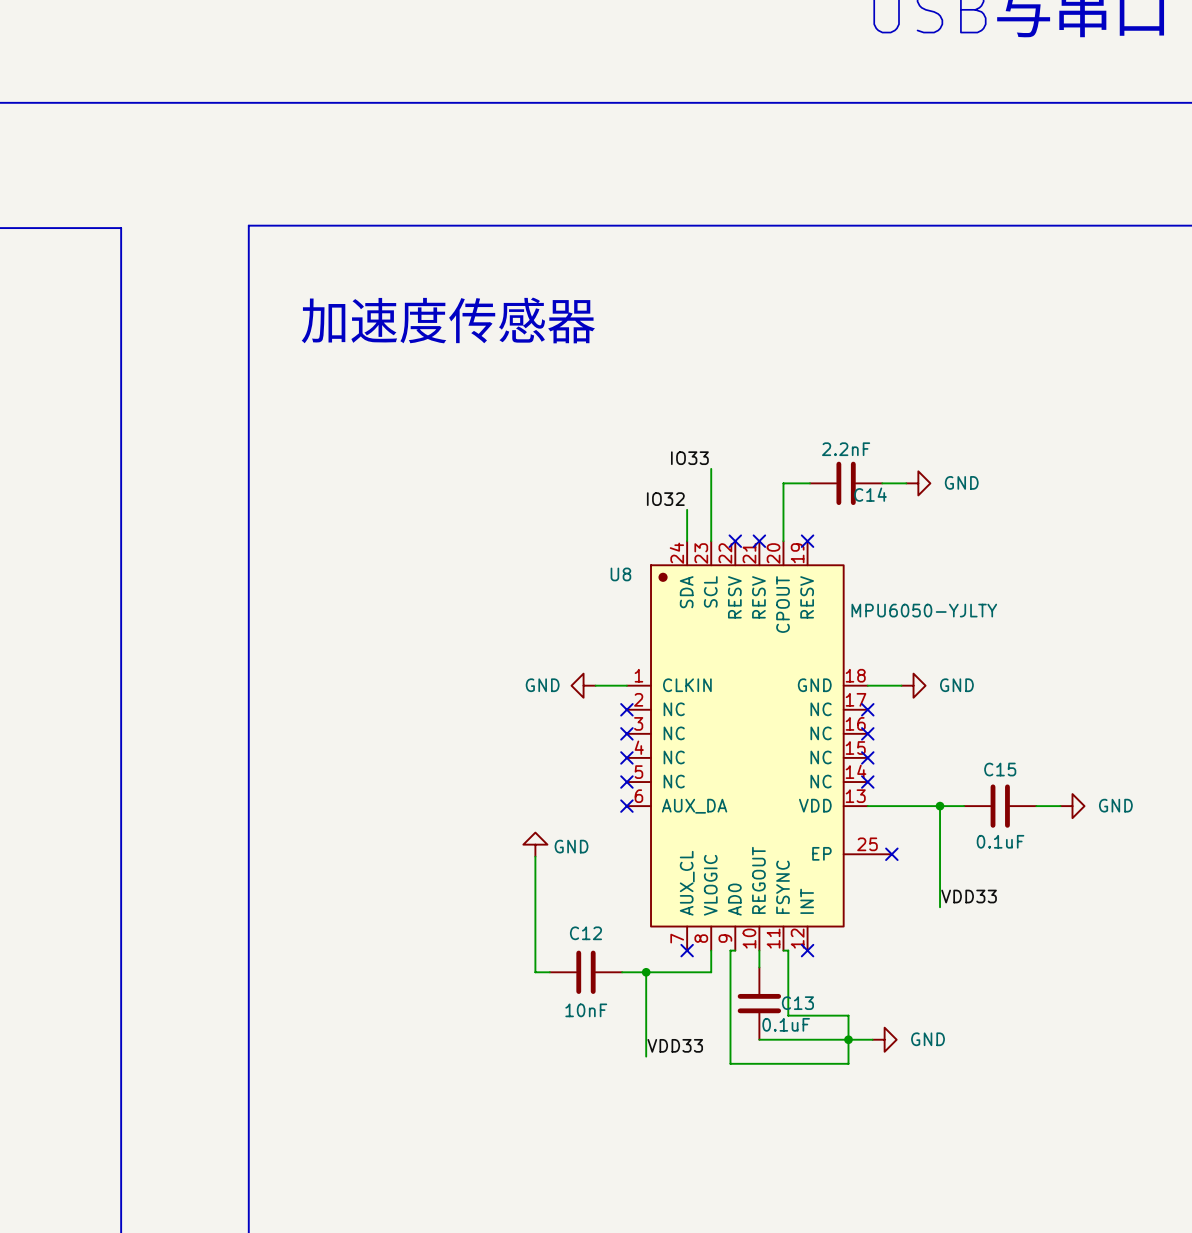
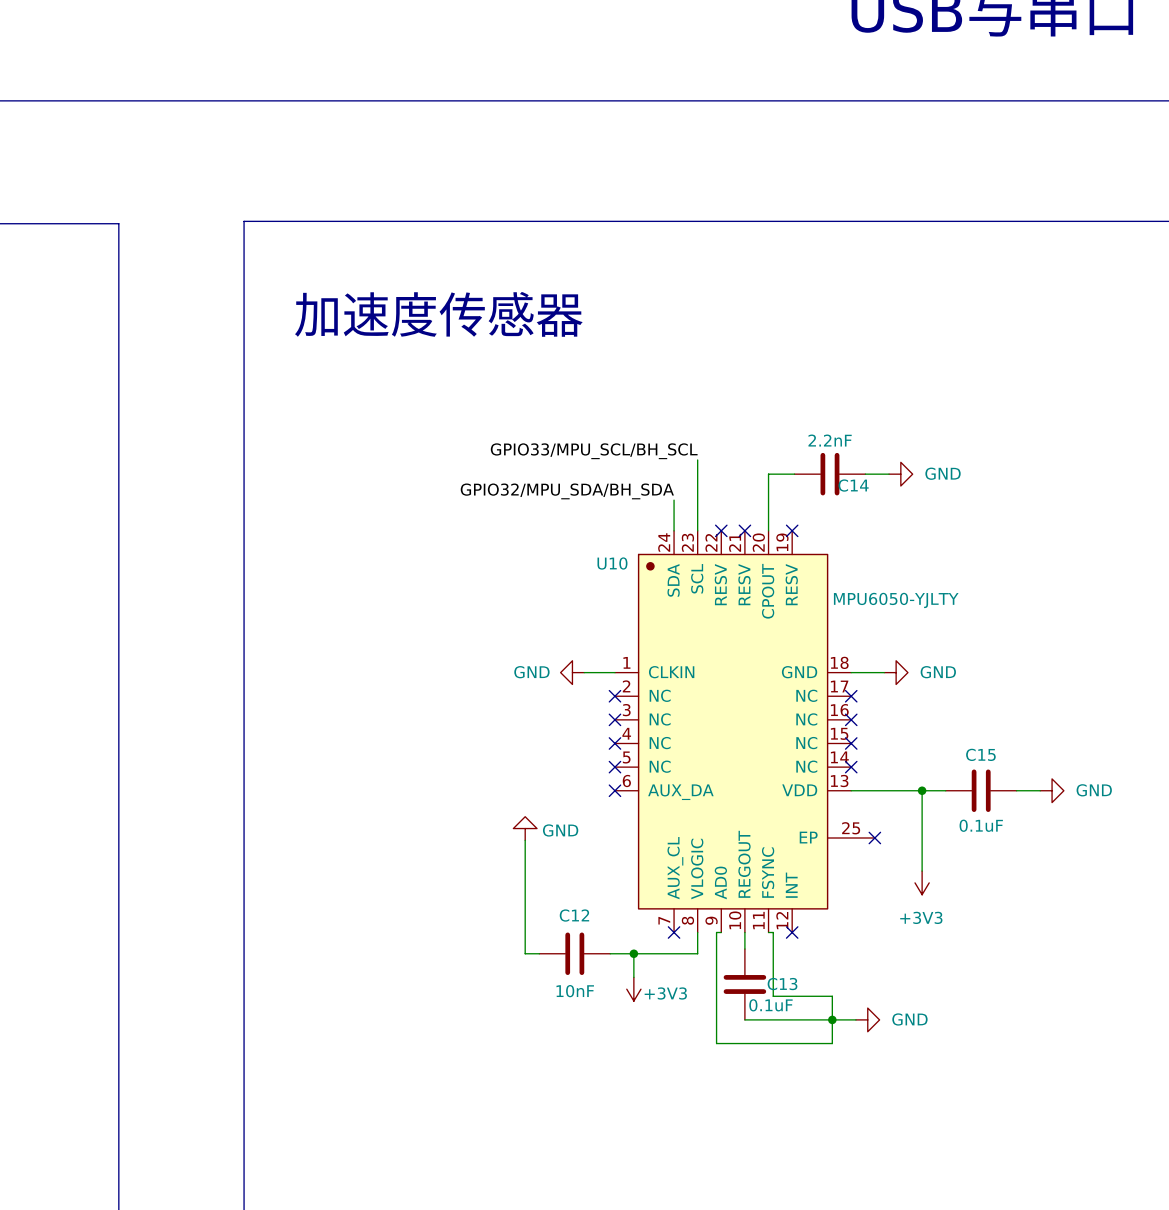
label: IO33 (689, 458) -> GPIO33/MPU_SCL/BH_SCL (594, 451)
label: IO32 (665, 499) -> GPIO32/MPU_SDA/BH_SDA (567, 491)
U8 name: U8 (620, 574) -> U10 (612, 563)
label: VDD33 (969, 896) -> none
power symbol: none -> +3V3 (922, 882)
wire: (646, 996) (646, 1056) -> none
power symbol: none -> +3V3 (633, 989)
label: VDD33 (675, 1045) -> none

